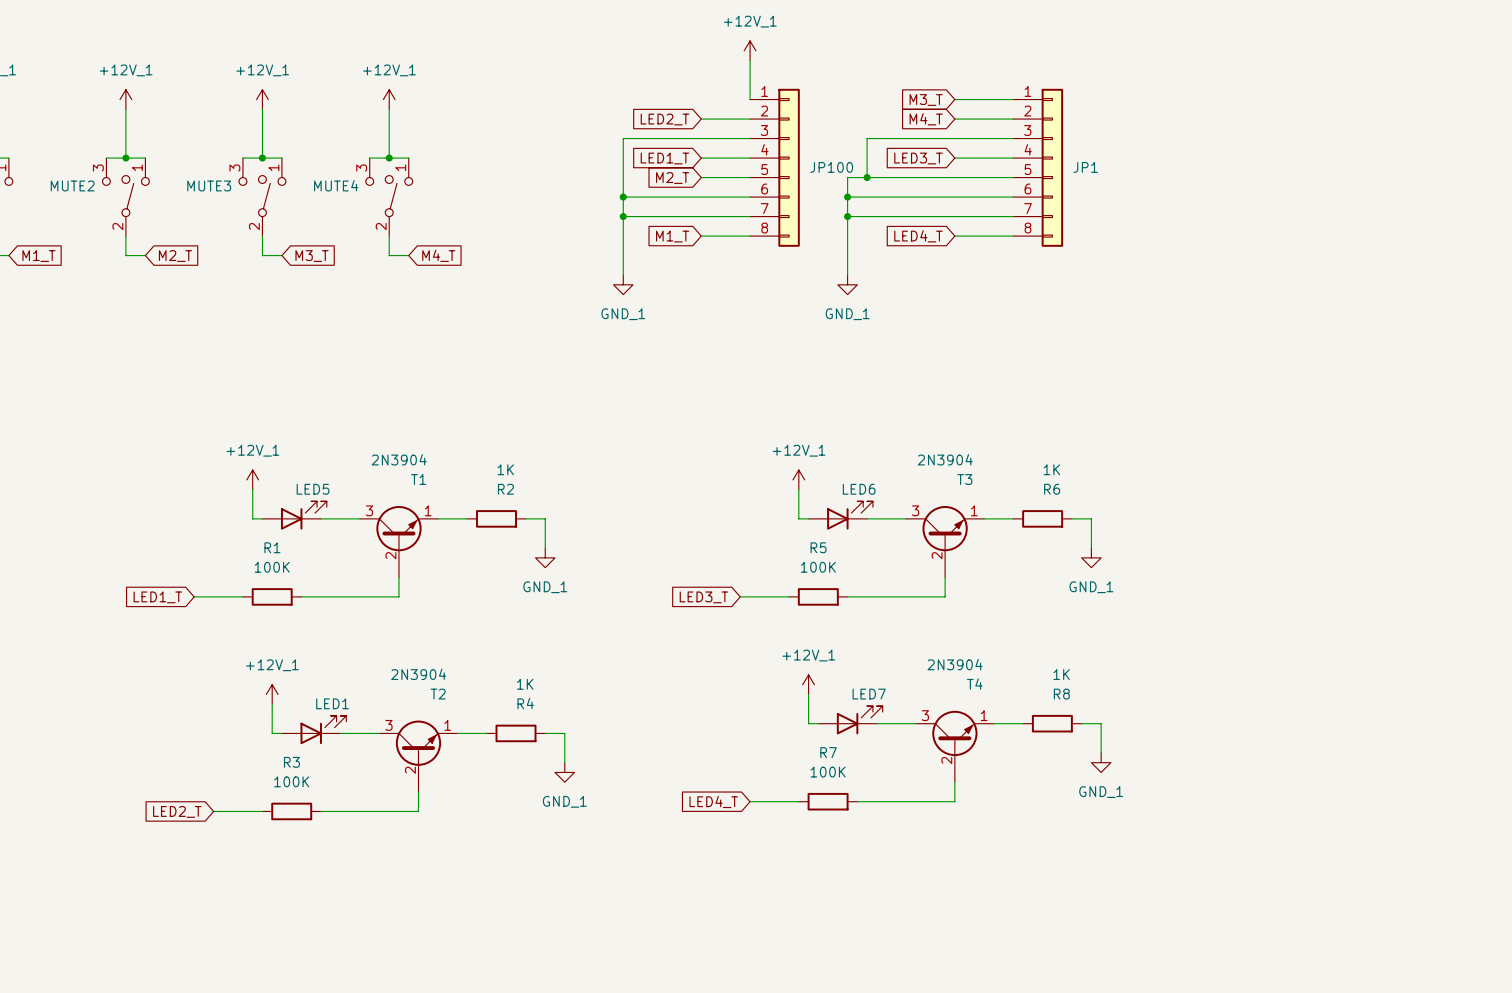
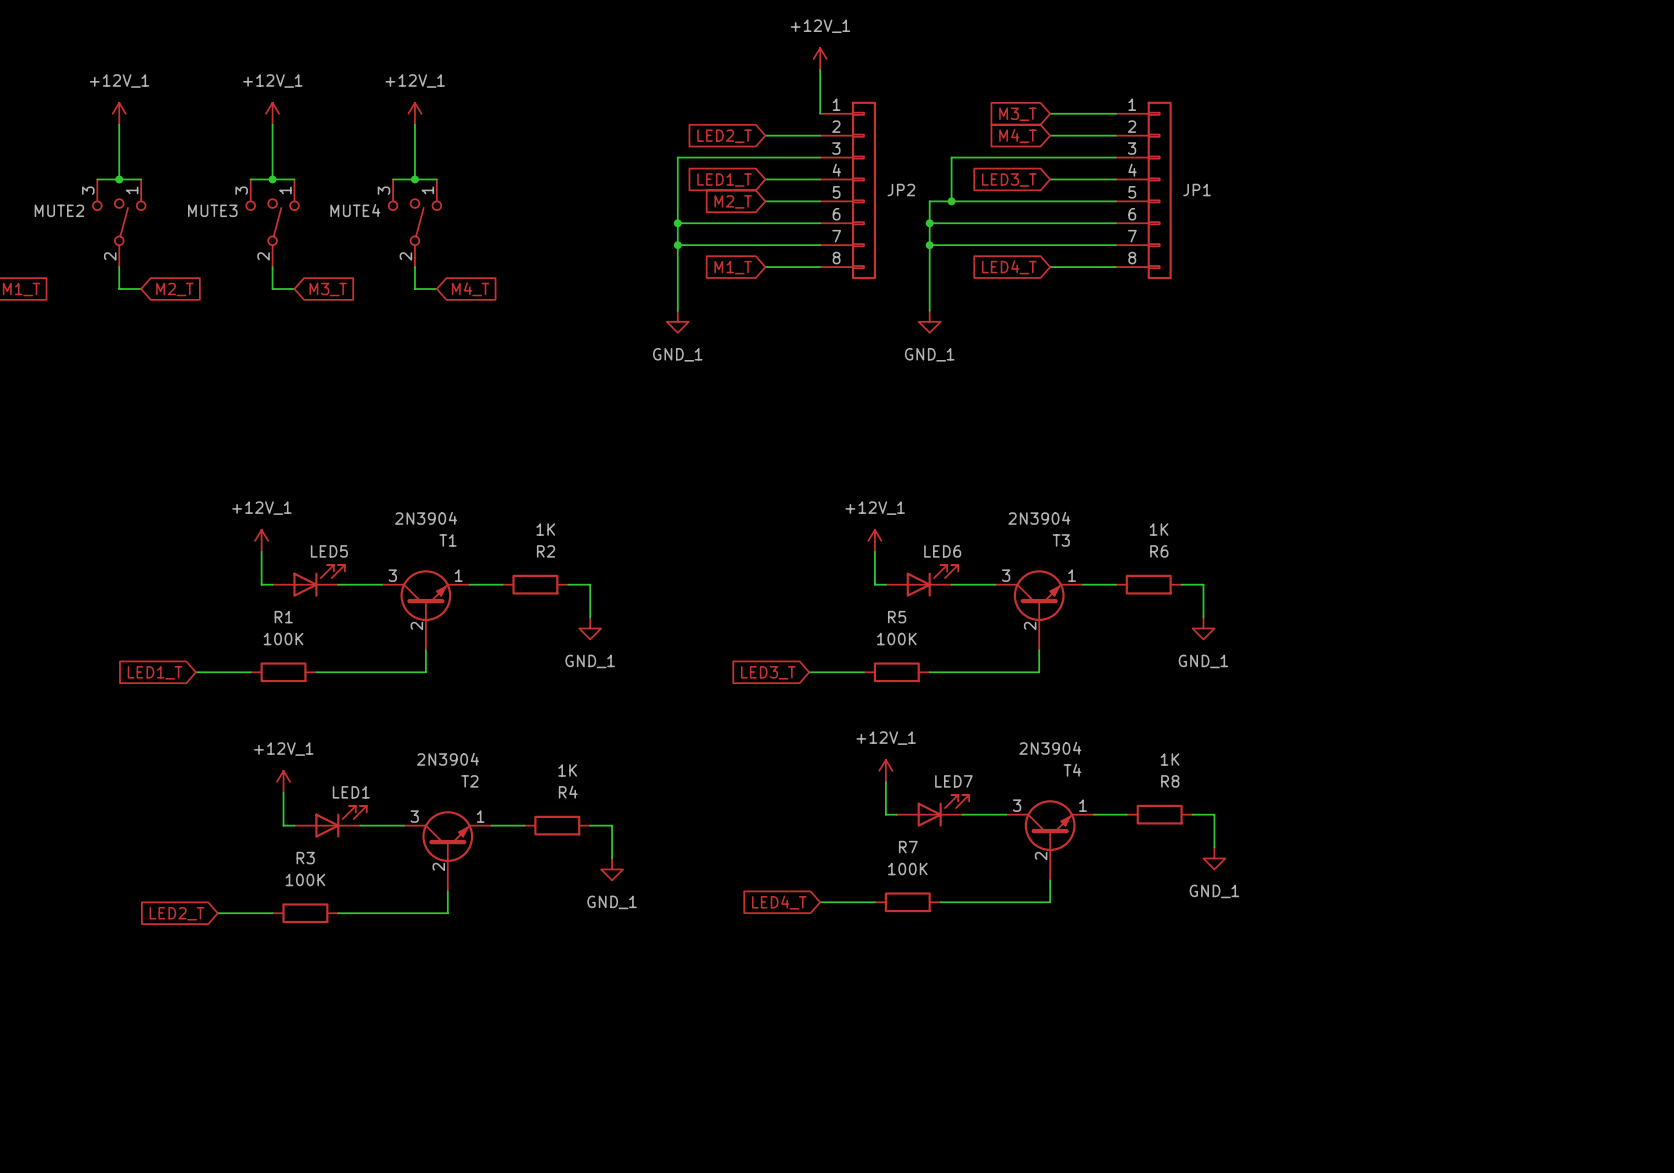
JP100 name: JP100 (831, 167) -> JP2 (901, 190)

